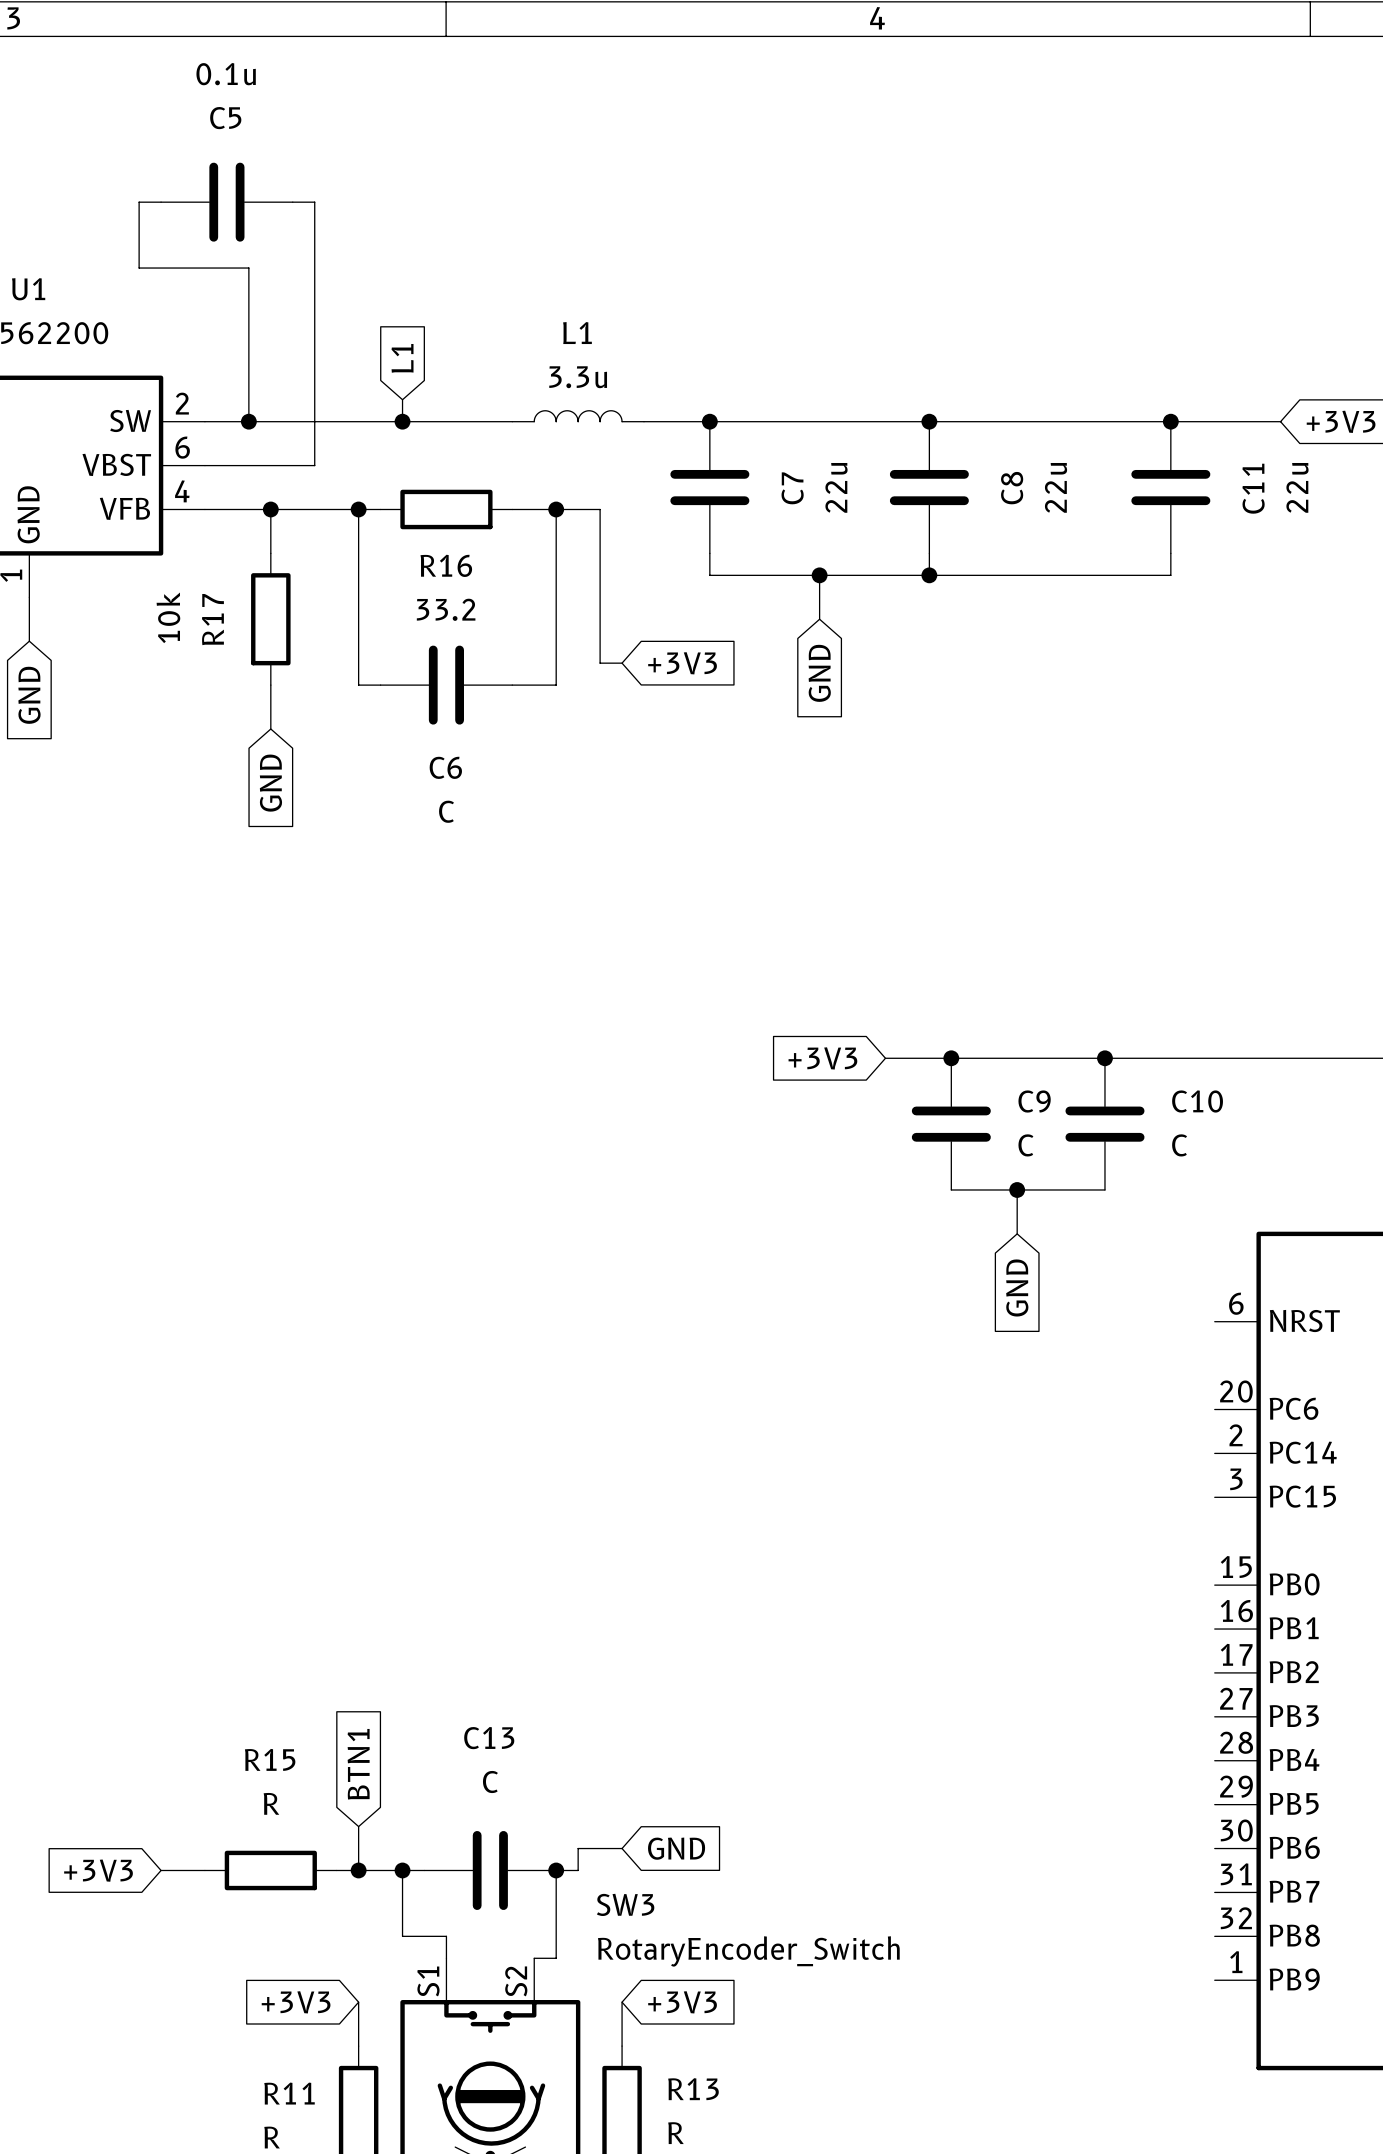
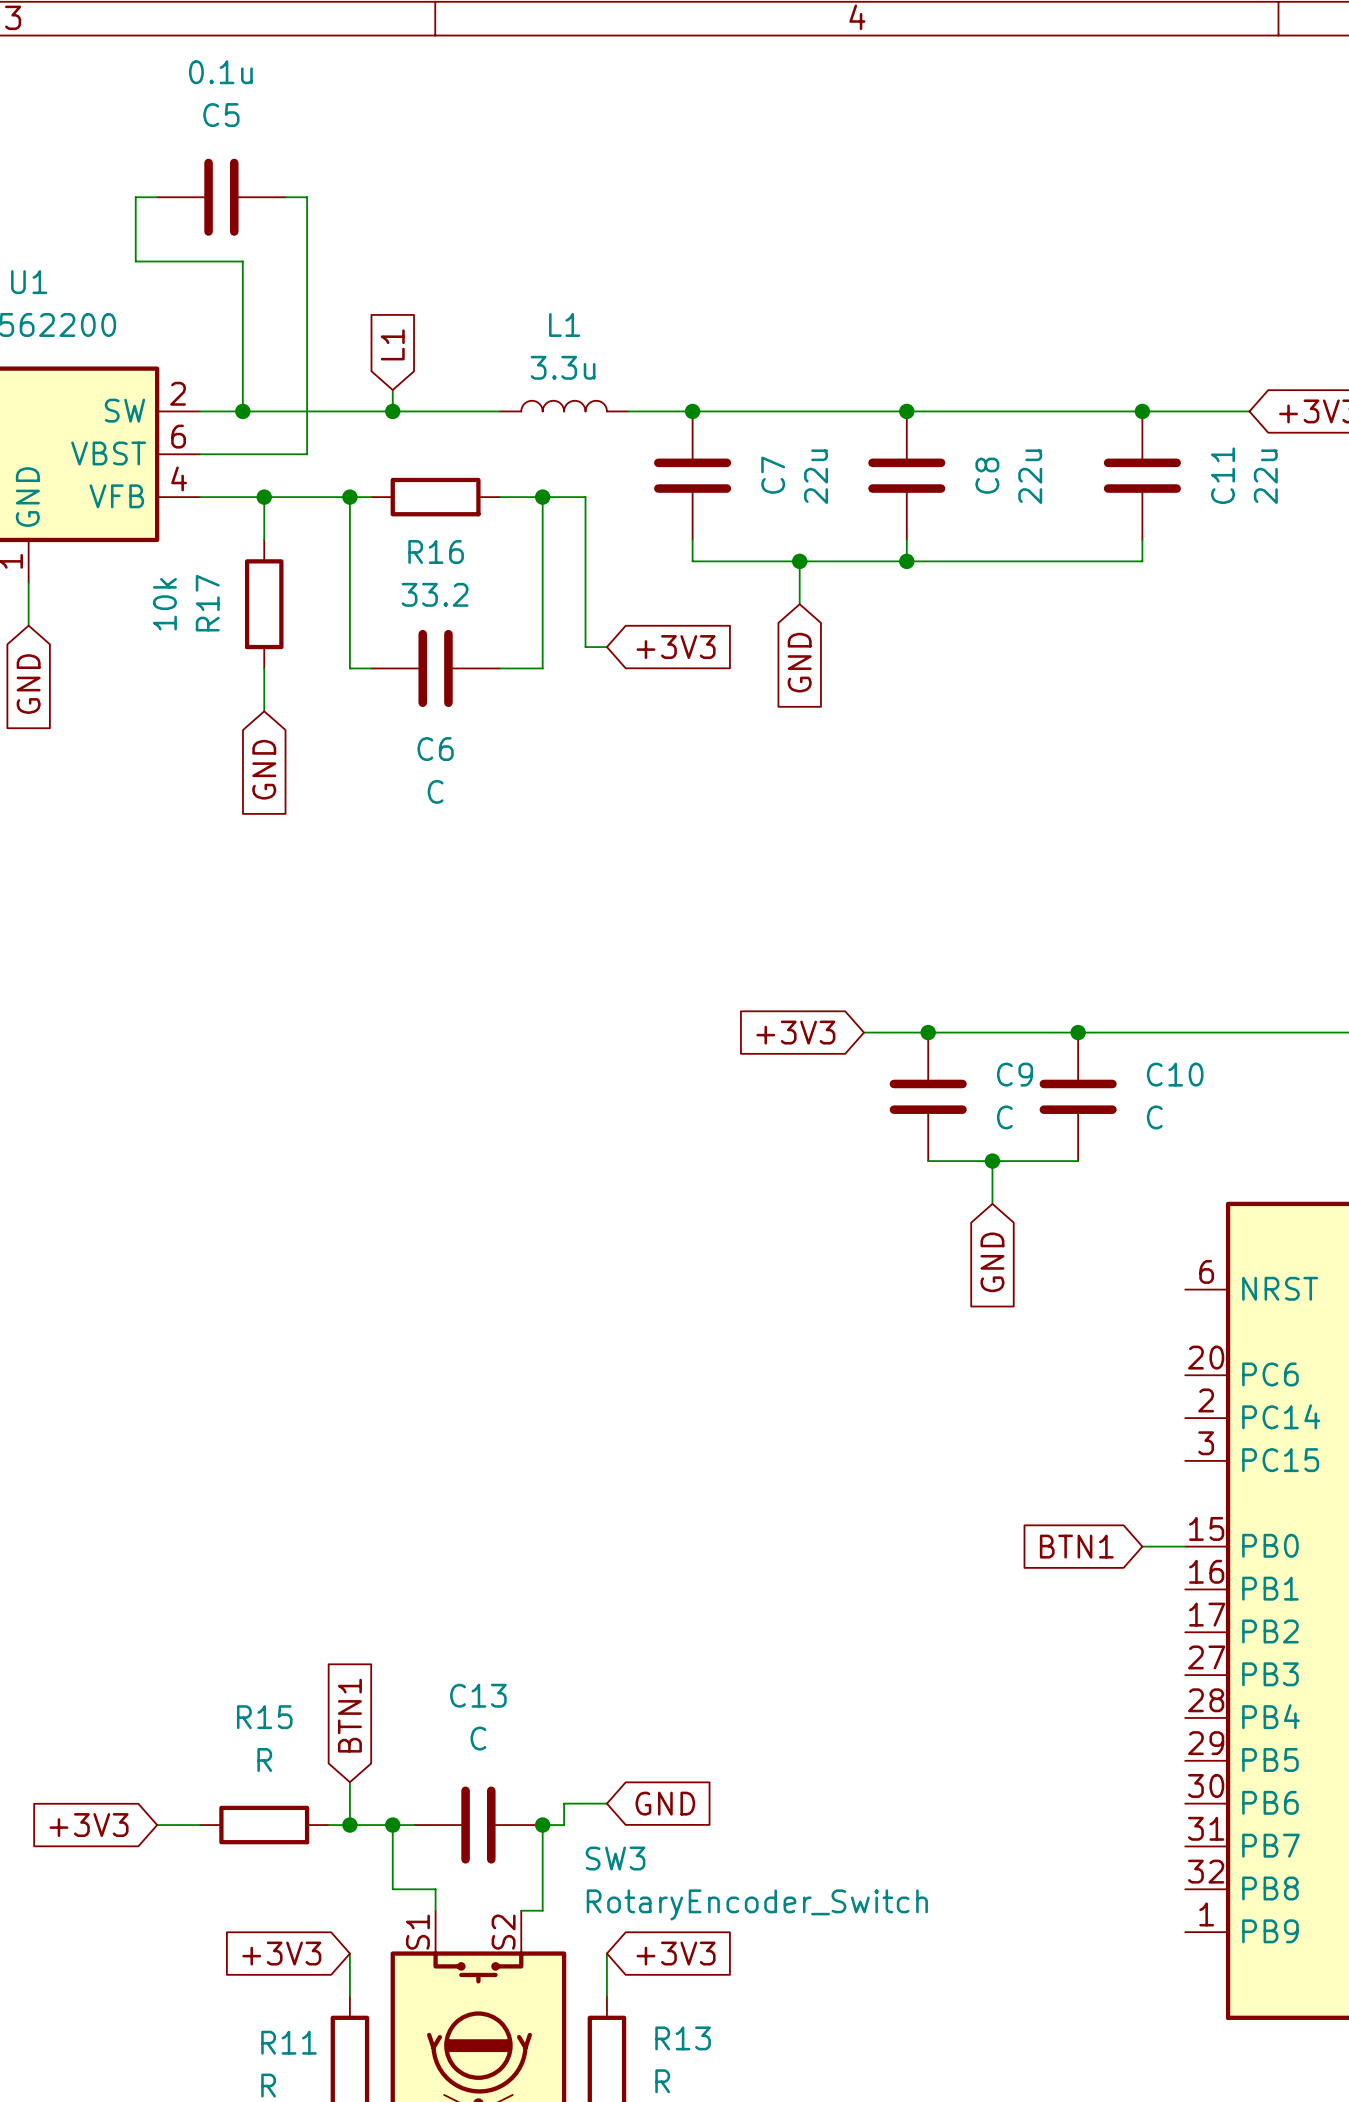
global label: none -> BTN1 (1076, 1546)
wire: none -> (1142, 1546) (1185, 1546)

